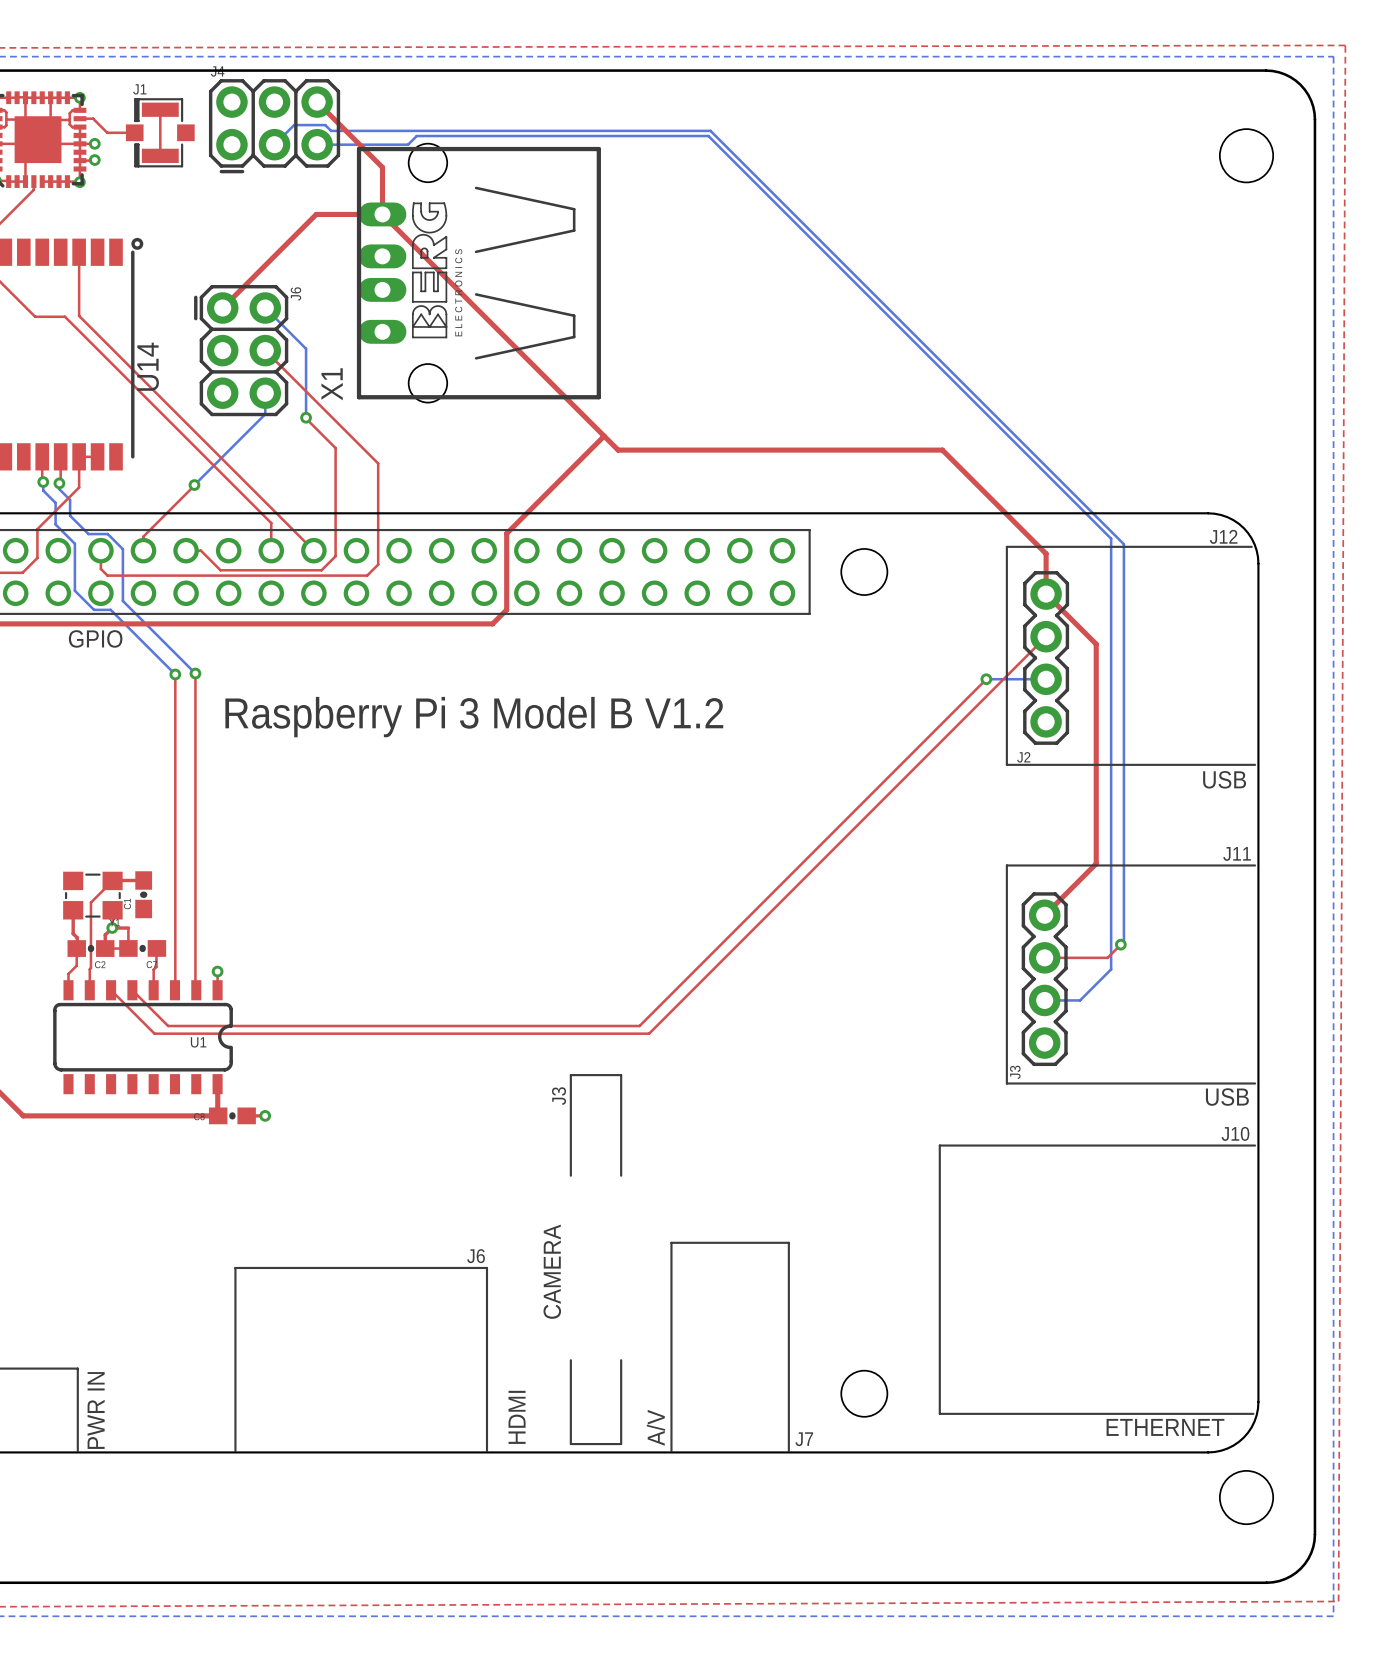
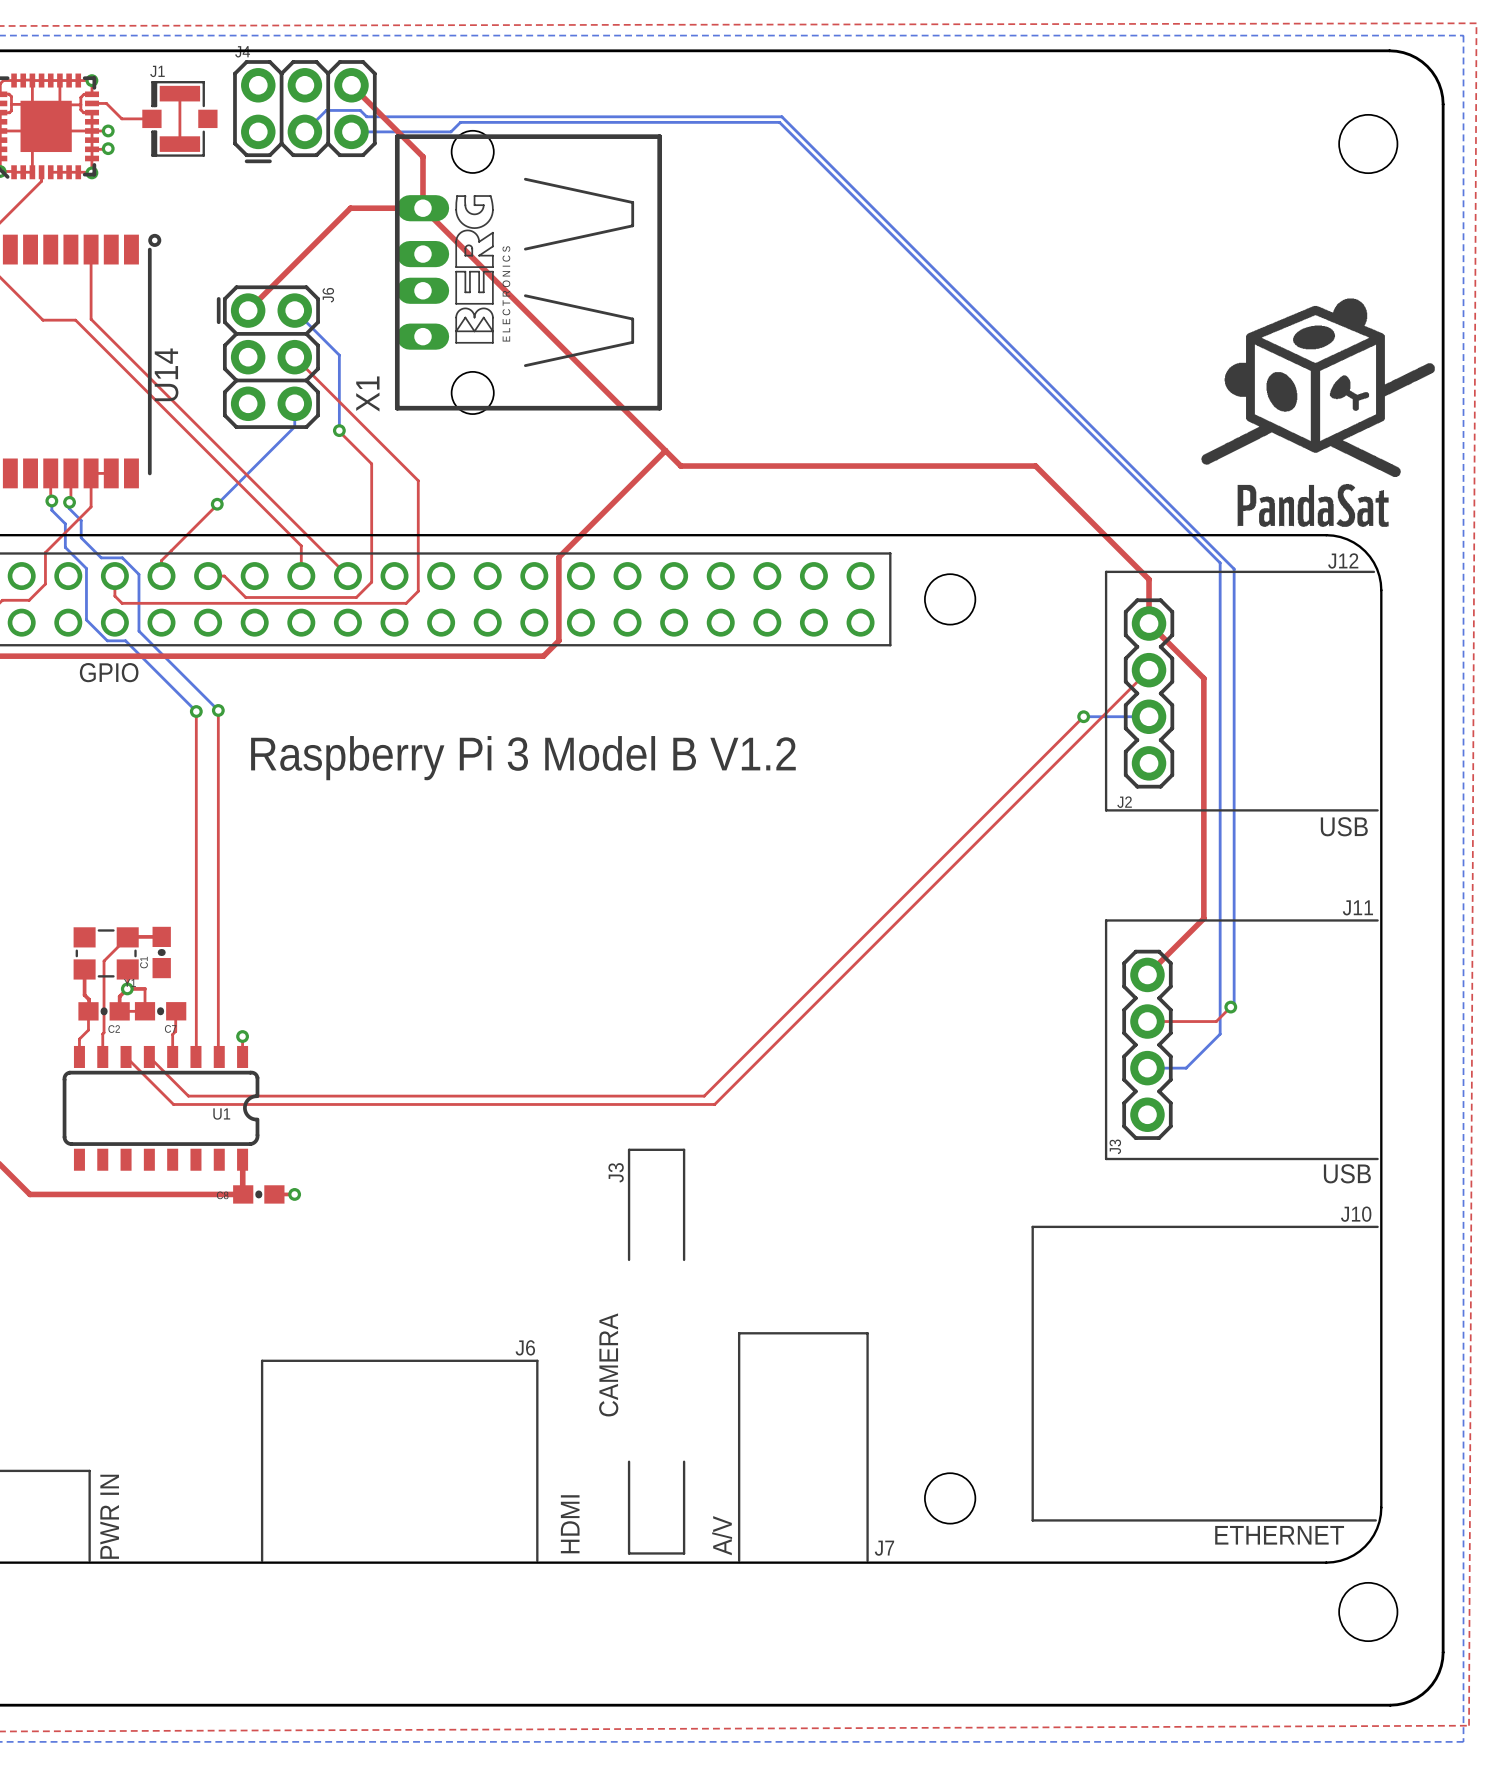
drawing: none -> [1201, 298, 1435, 527]

